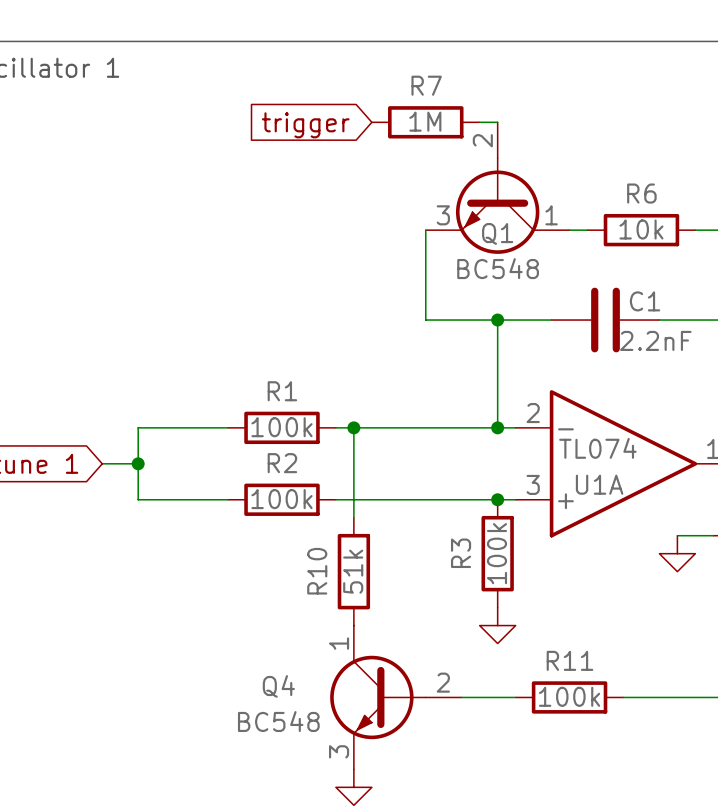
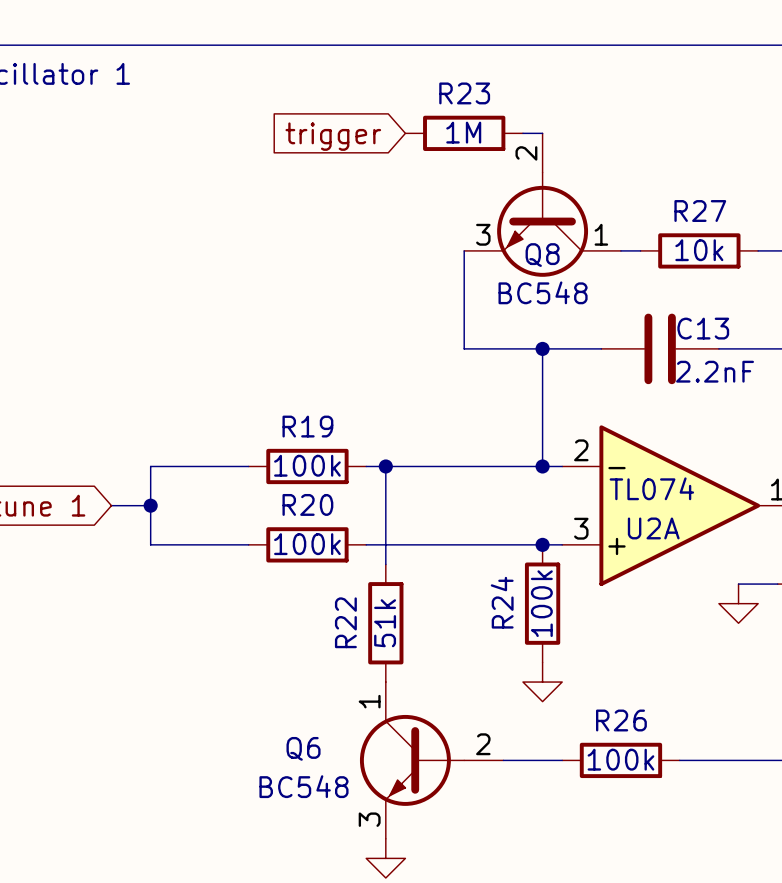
R7 name: R7 (426, 85) -> R23 (464, 93)
R6 name: R6 (641, 193) -> R27 (700, 211)
Q1 name: Q1 (497, 233) -> Q8 (542, 255)
C1 name: C1 (645, 301) -> C13 (703, 328)
R1 name: R1 (282, 391) -> R19 (307, 426)
R2 name: R2 (282, 463) -> R20 (307, 504)
U1A name: U1A (599, 484) -> U2A (653, 528)
R3 name: R3 (461, 553) -> R24 (502, 602)
R10 name: R10 (317, 571) -> R22 (345, 622)
R11 name: R11 (569, 660) -> R26 (621, 720)
Q4 name: Q4 (278, 686) -> Q6 (303, 748)

